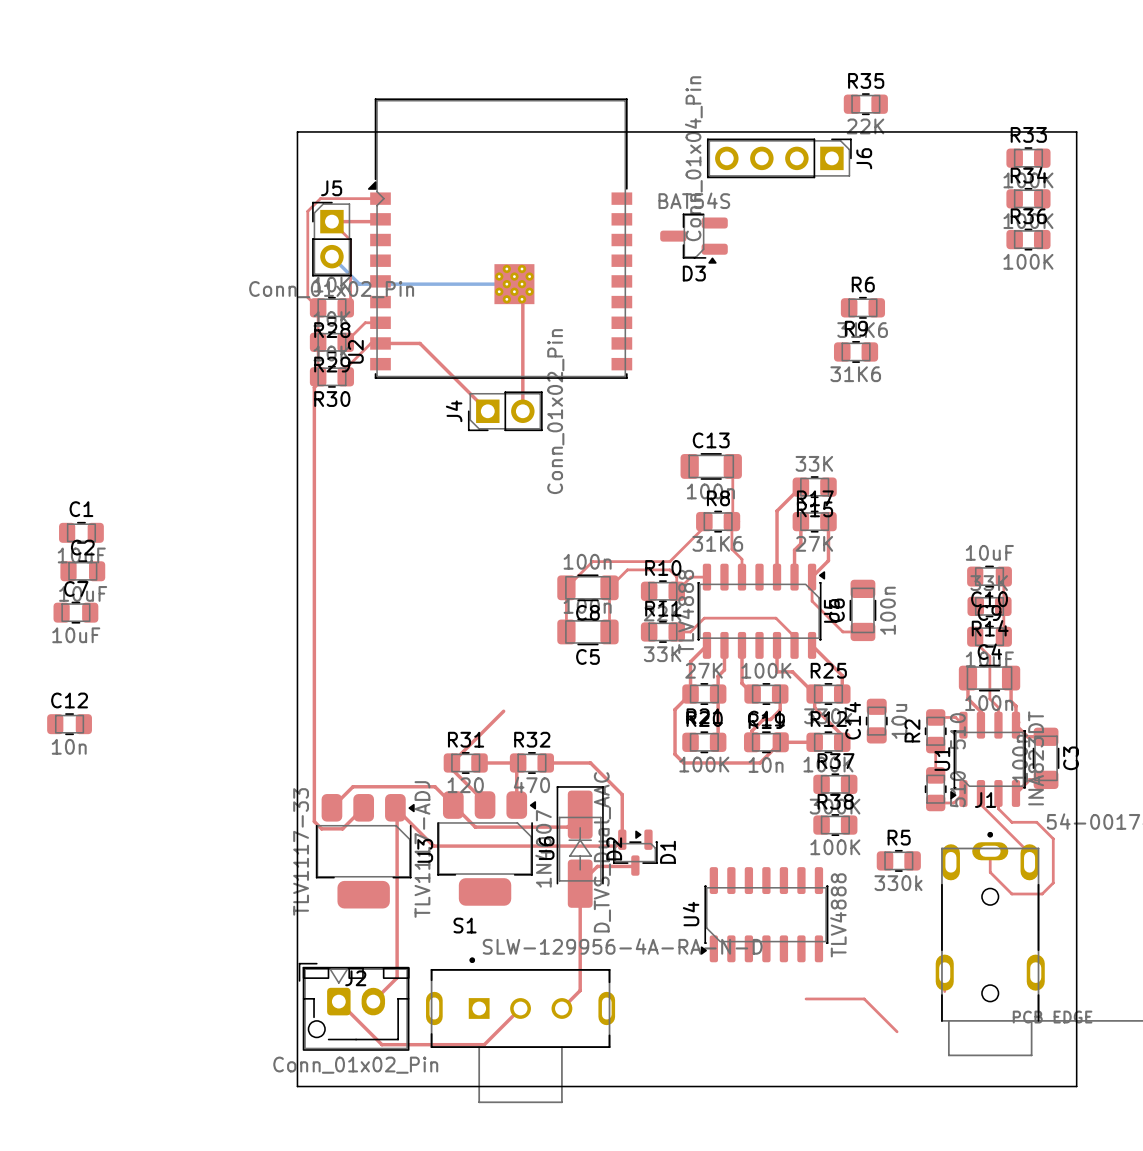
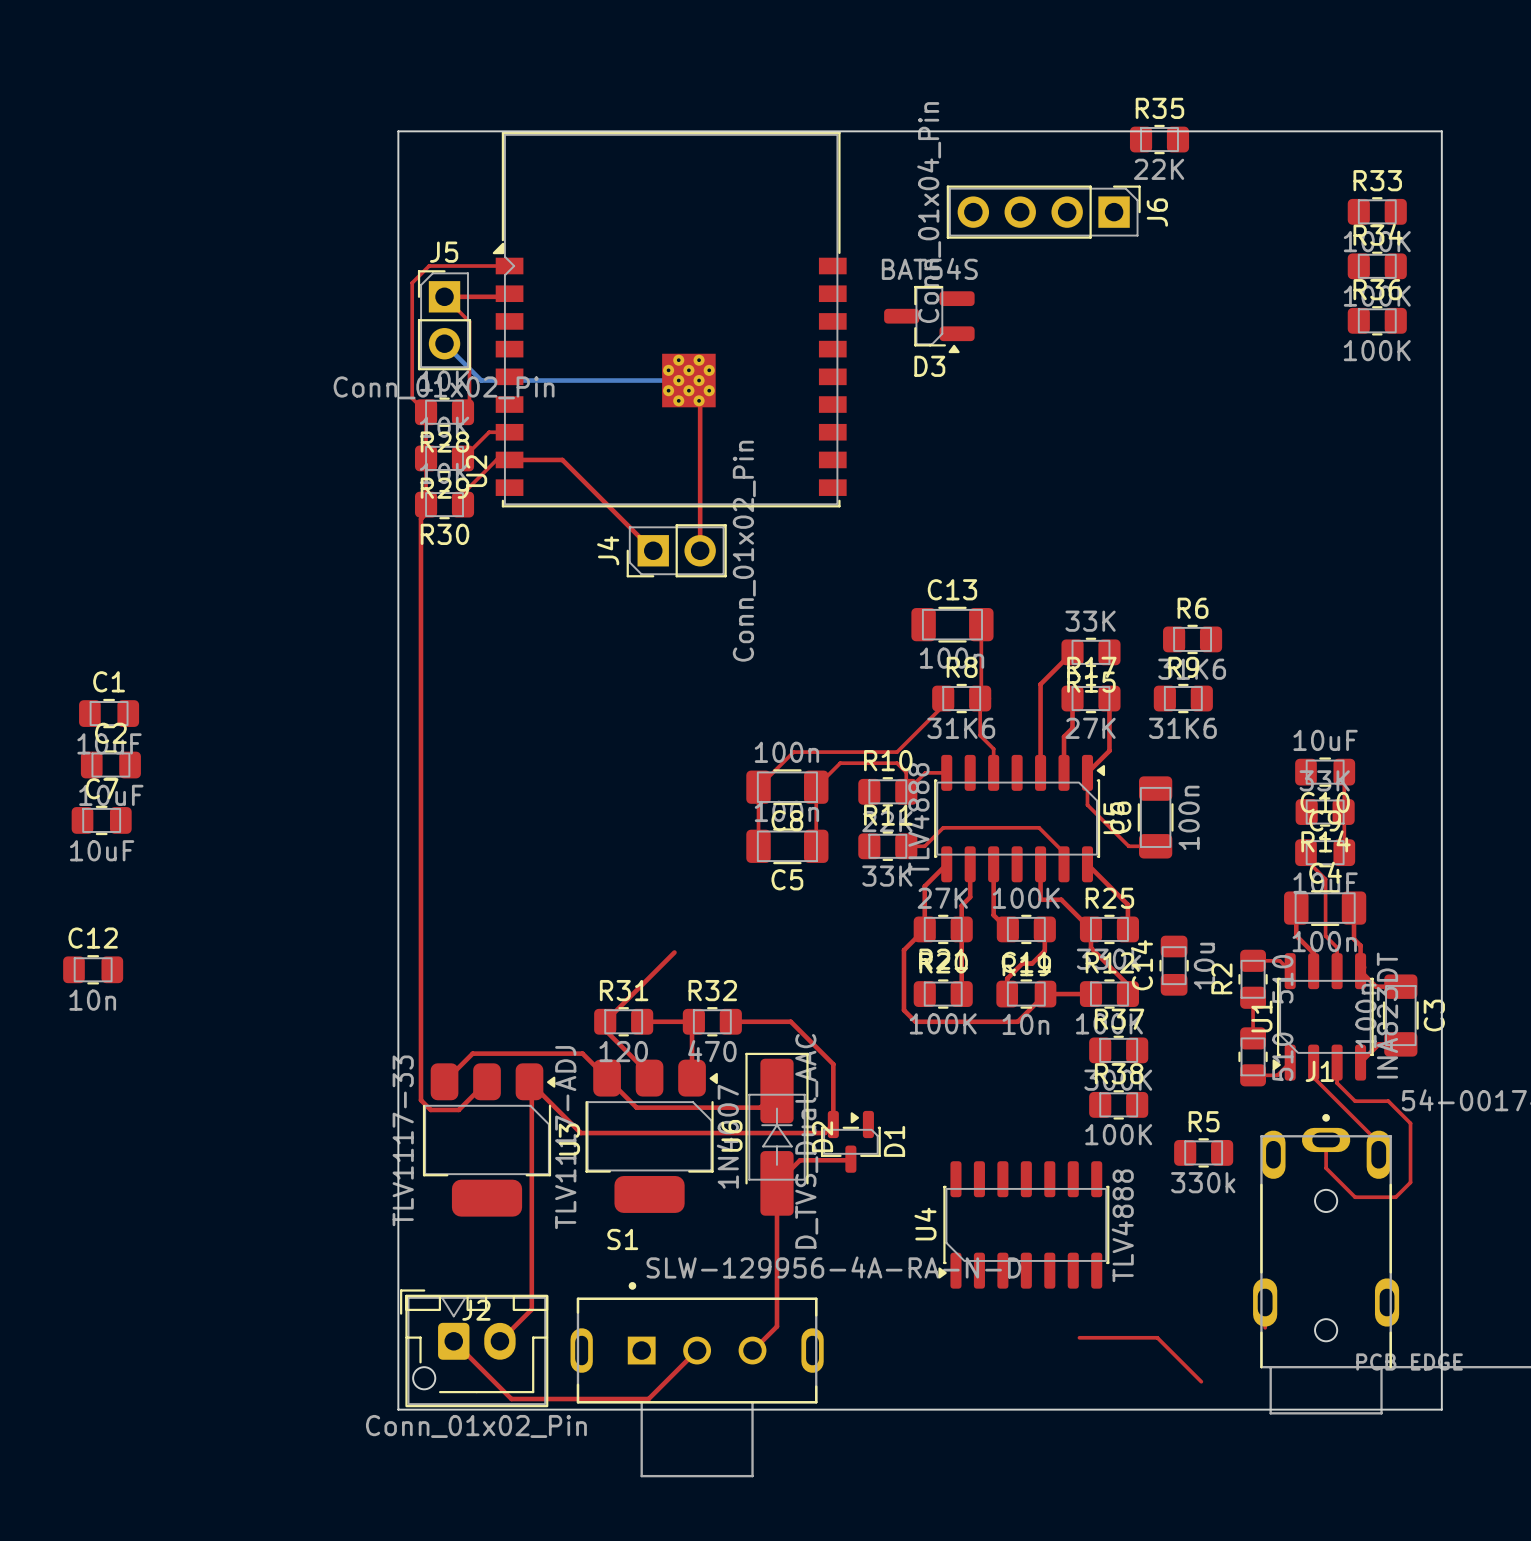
board edge: (297, 131) (1076, 131) -> (398, 176) (398, 131) (1441, 131) (1441, 176)
R6 position: (862, 307) -> (1192, 639)
R9 position: (856, 351) -> (1183, 698)
board edge: (297, 1052) (297, 1086) (1076, 1086) (1076, 1052) -> (398, 1409) (1441, 1409)

